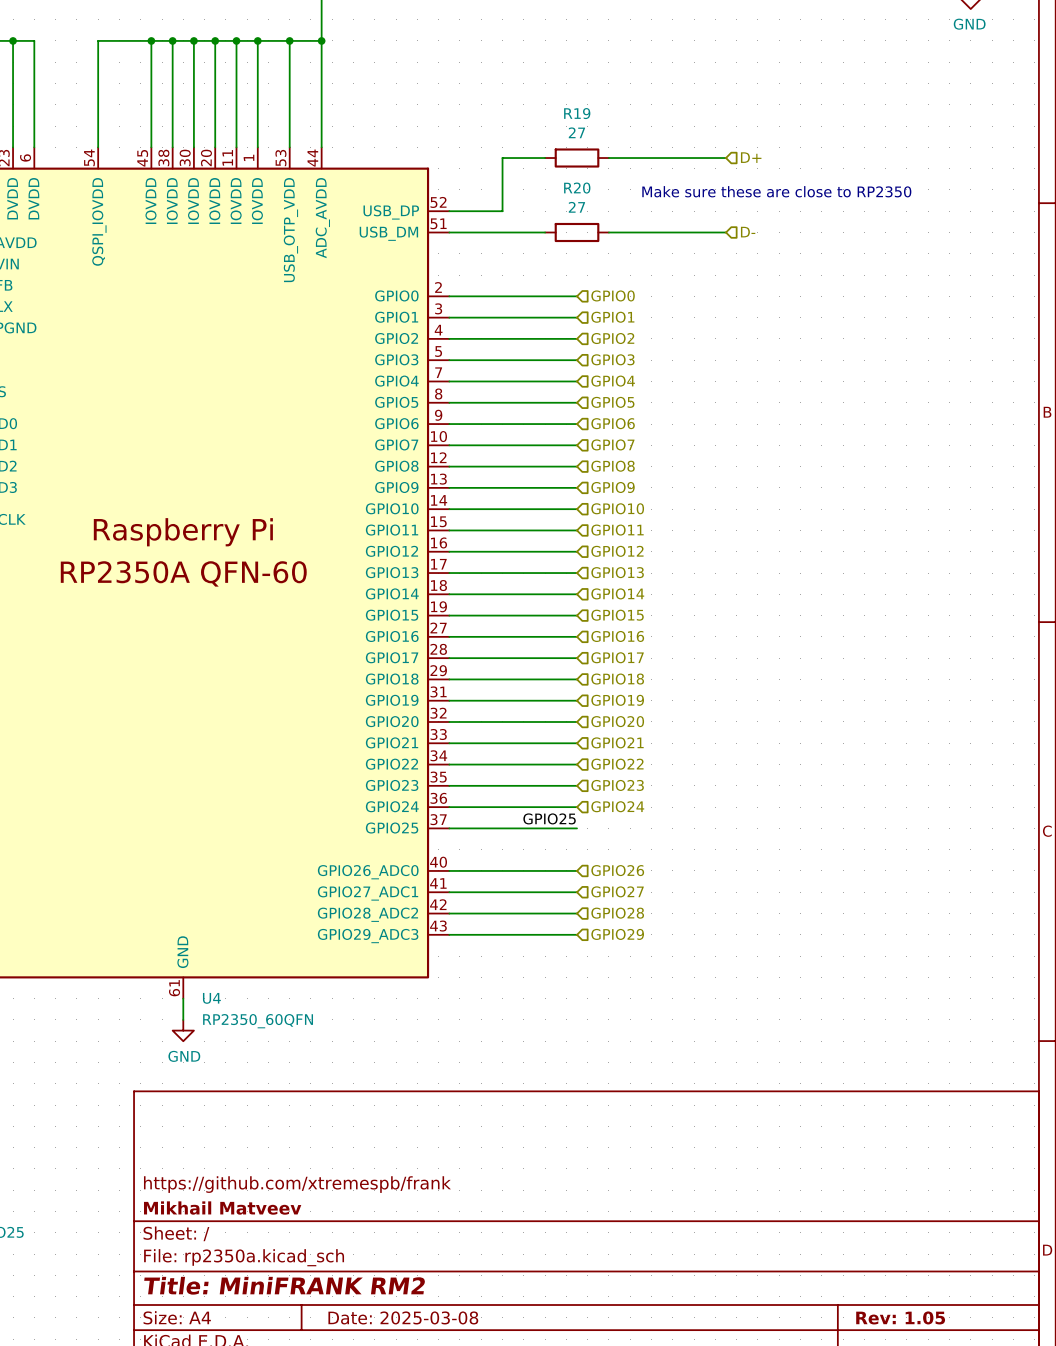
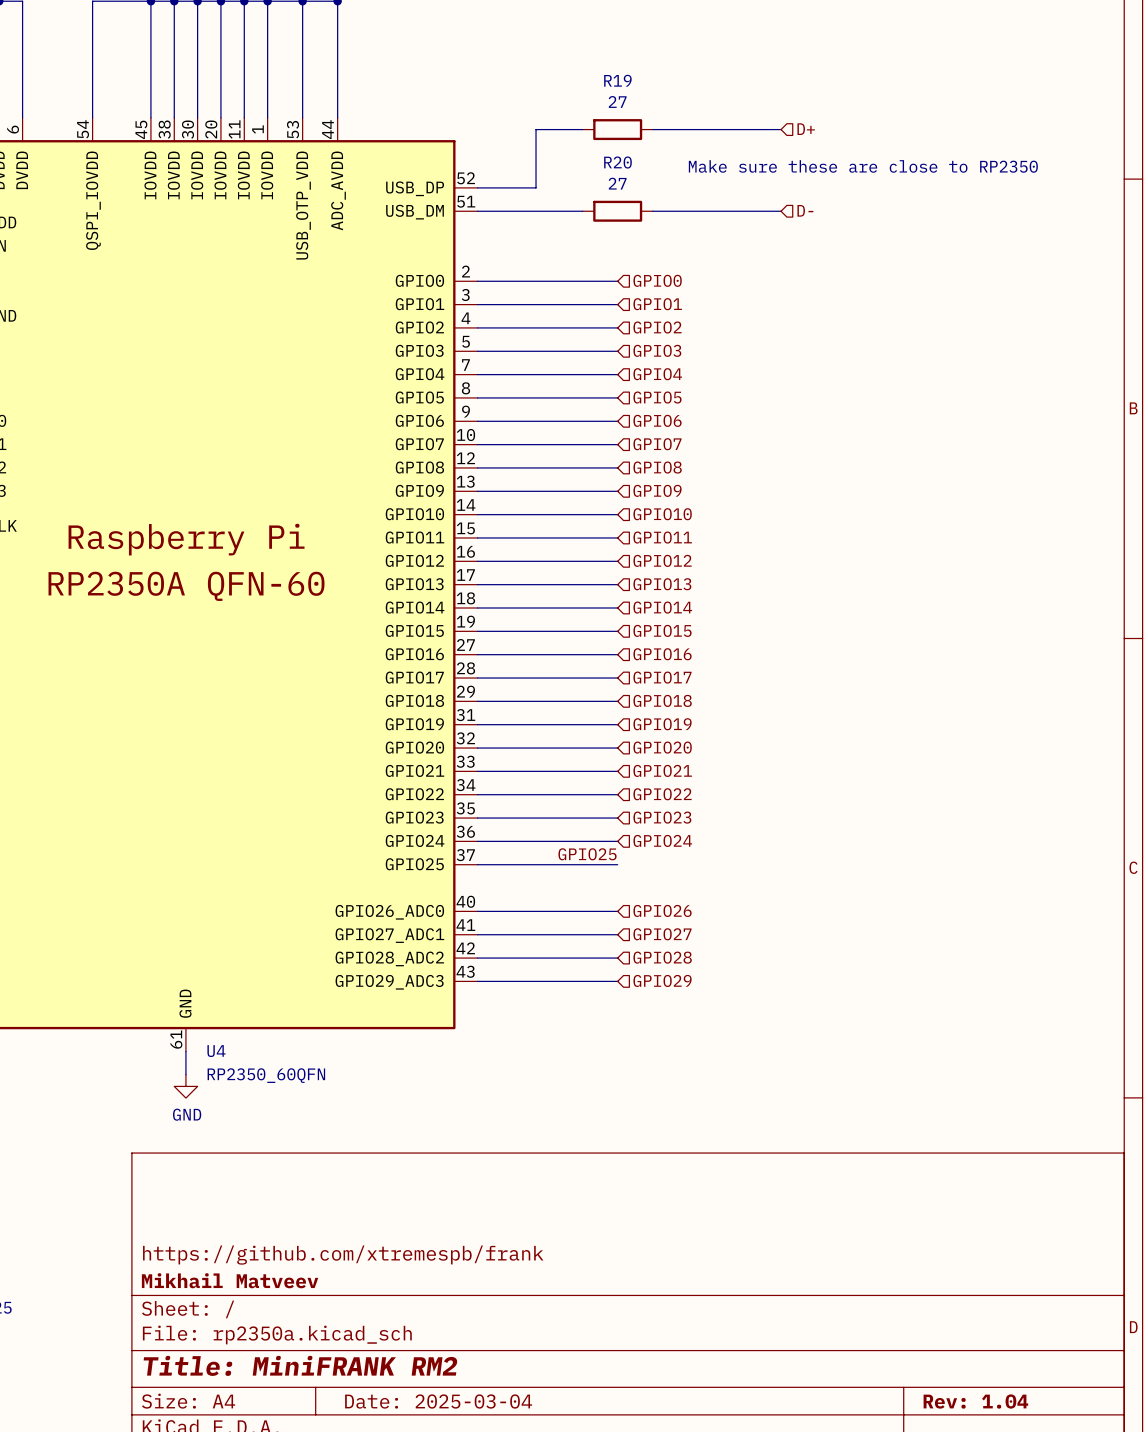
title block: Date: 2025-03-08 (403, 1317) -> Date: 2025-03-04 (438, 1401)
title block: Rev: 1.05 (900, 1317) -> Rev: 1.04 (975, 1401)

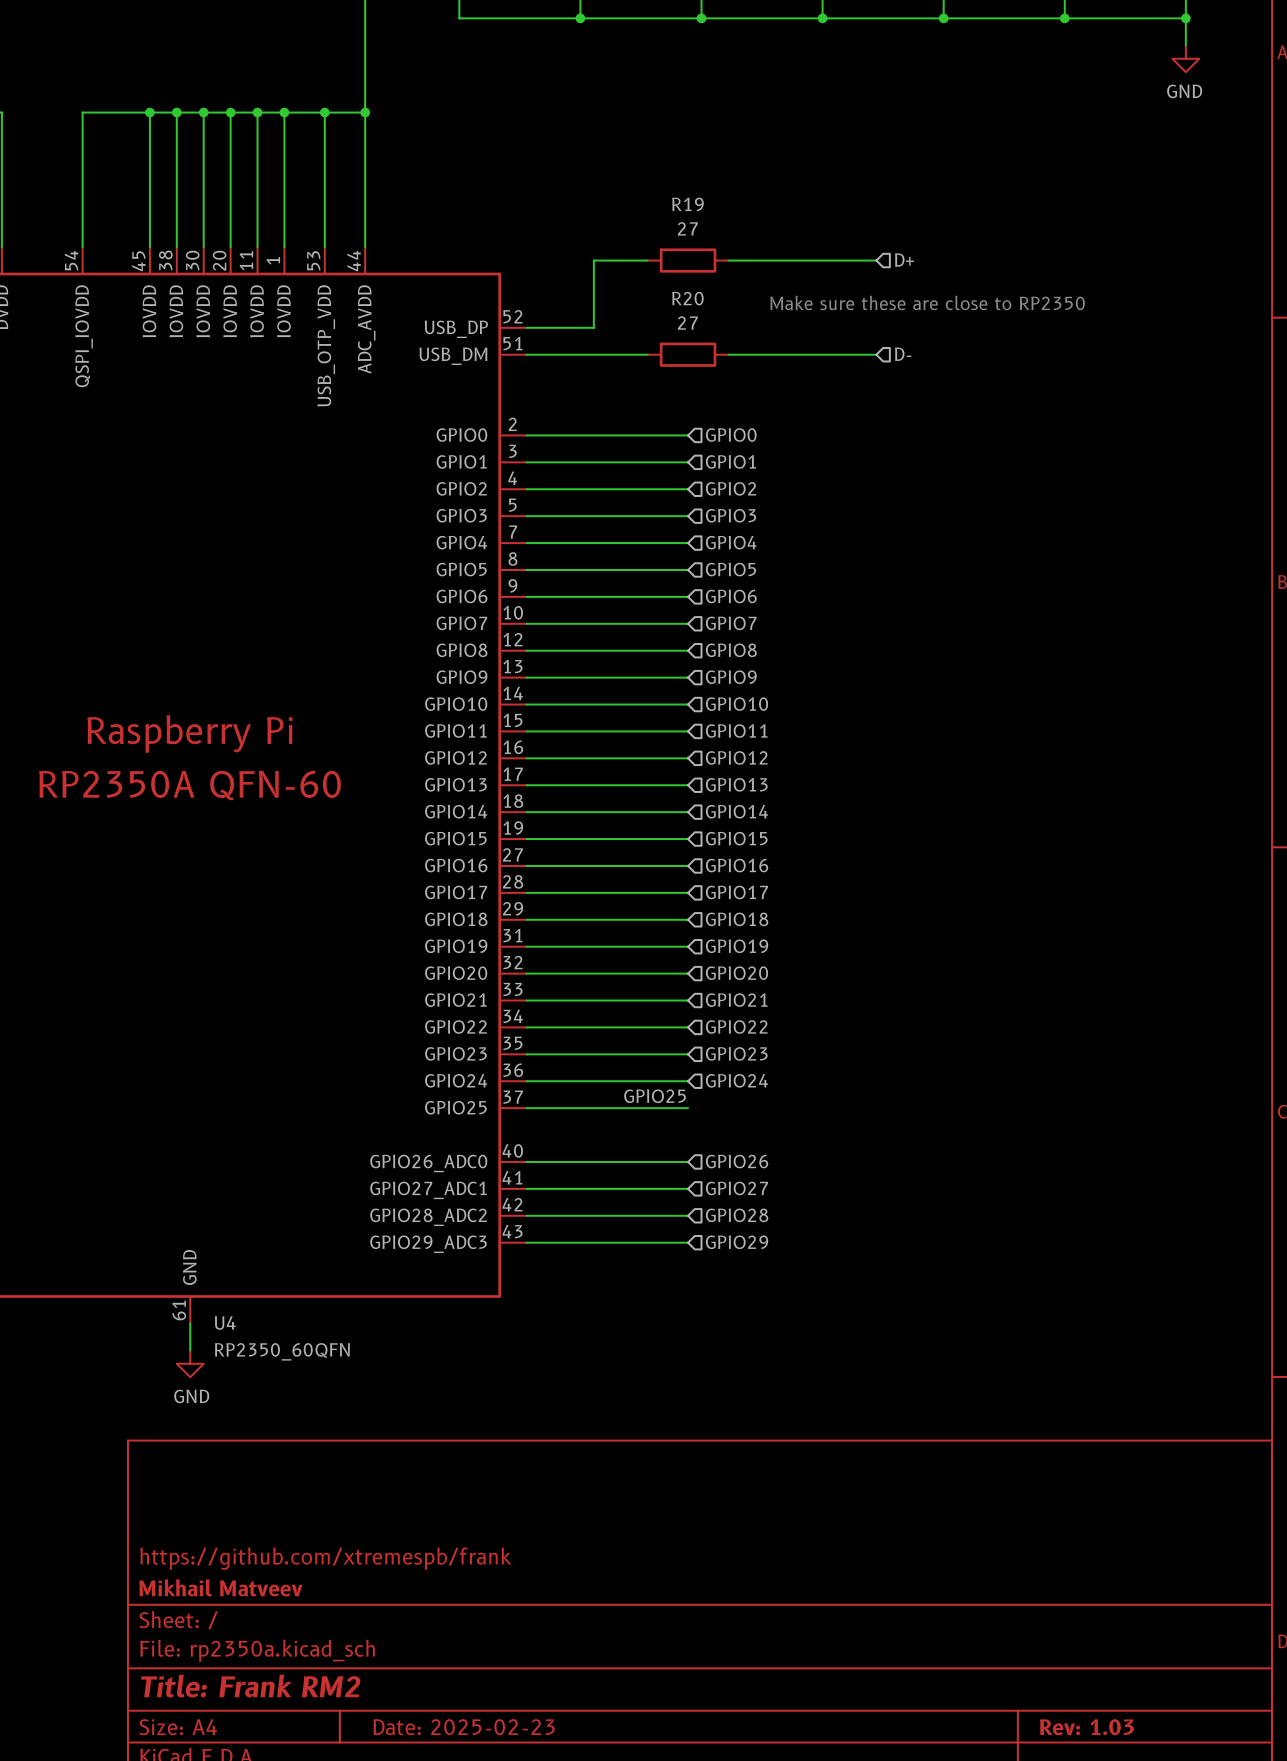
title block: Title: MiniFRANK RM2 (300, 1365) -> Title: Frank RM2 (250, 1686)
title block: Date: 2025-03-04 (438, 1401) -> Date: 2025-02-23 (464, 1727)
title block: Rev: 1.04 (975, 1401) -> Rev: 1.03 (1086, 1727)

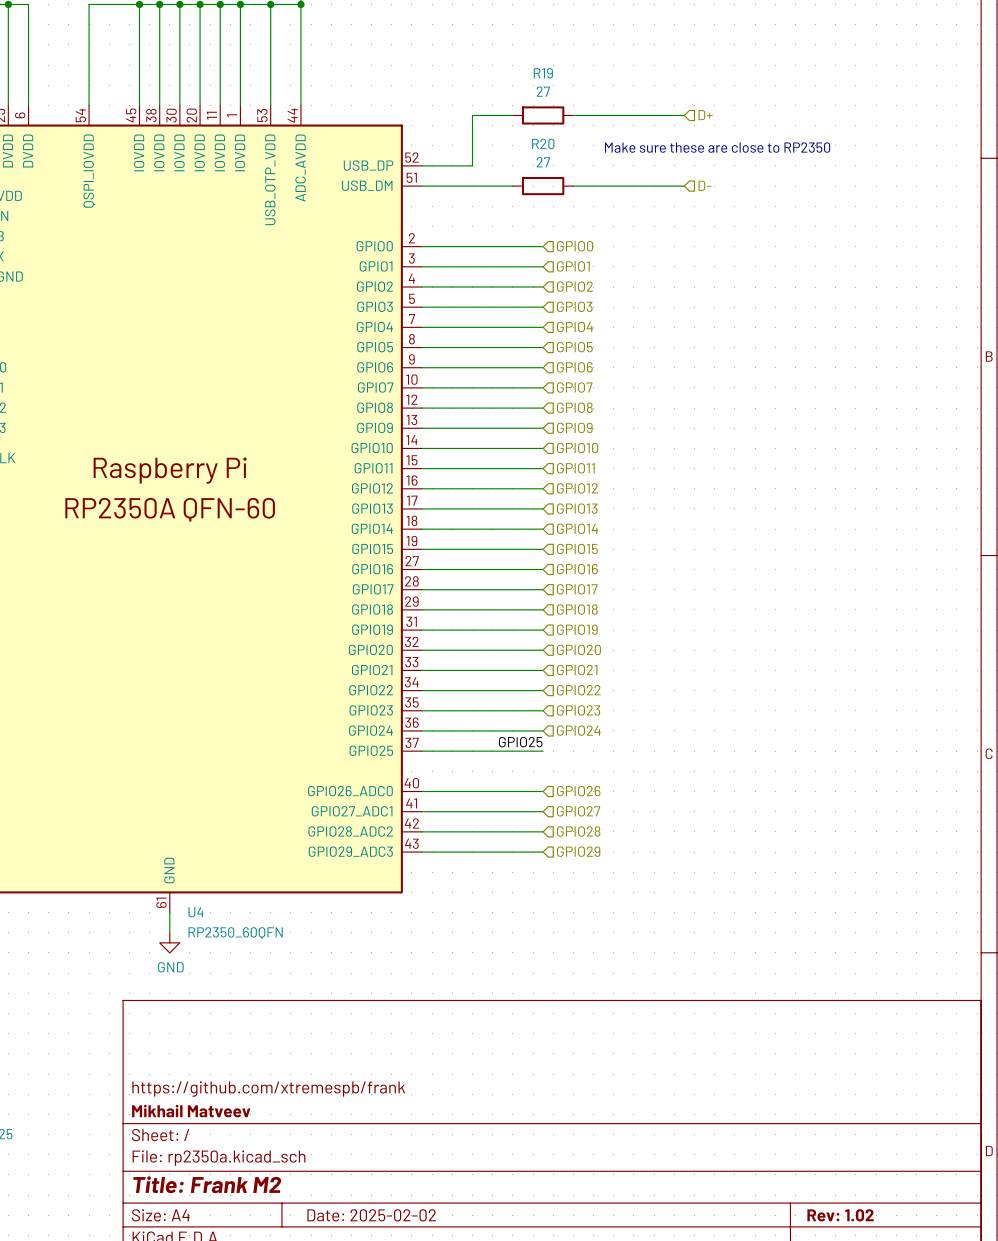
title block: Title: Frank RM2 (250, 1686) -> Title: Frank M2 (207, 1184)
title block: Date: 2025-02-23 (464, 1727) -> Date: 2025-02-02 (371, 1215)
title block: Rev: 1.03 (1086, 1727) -> Rev: 1.02 (840, 1215)

